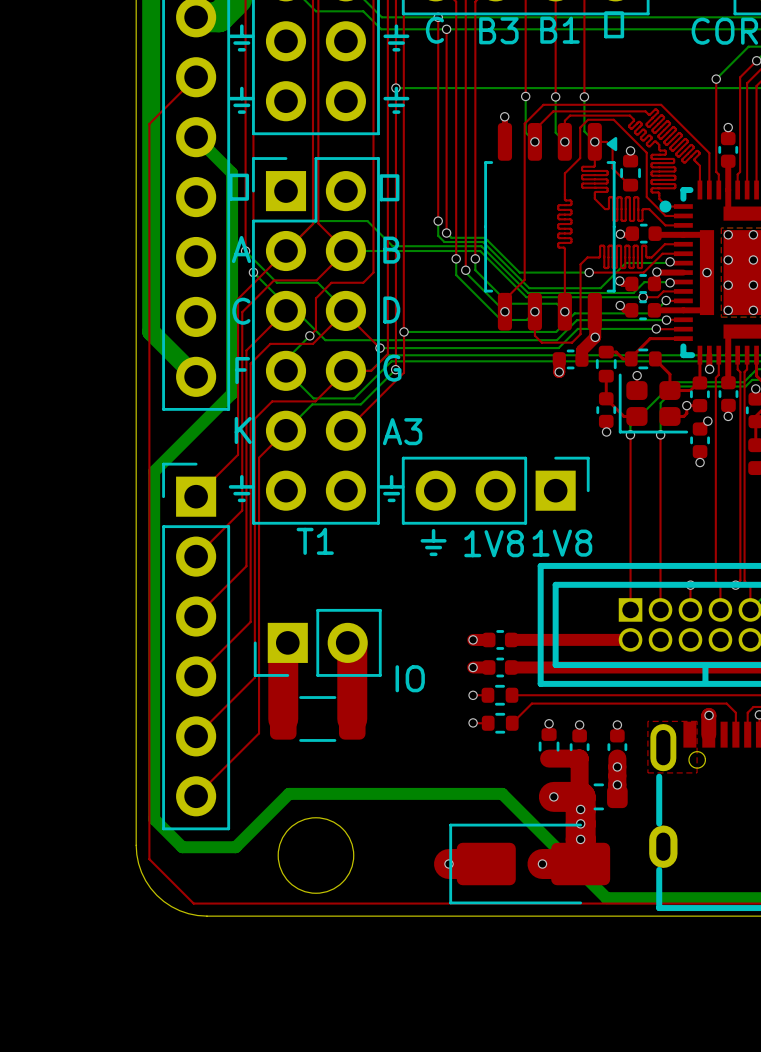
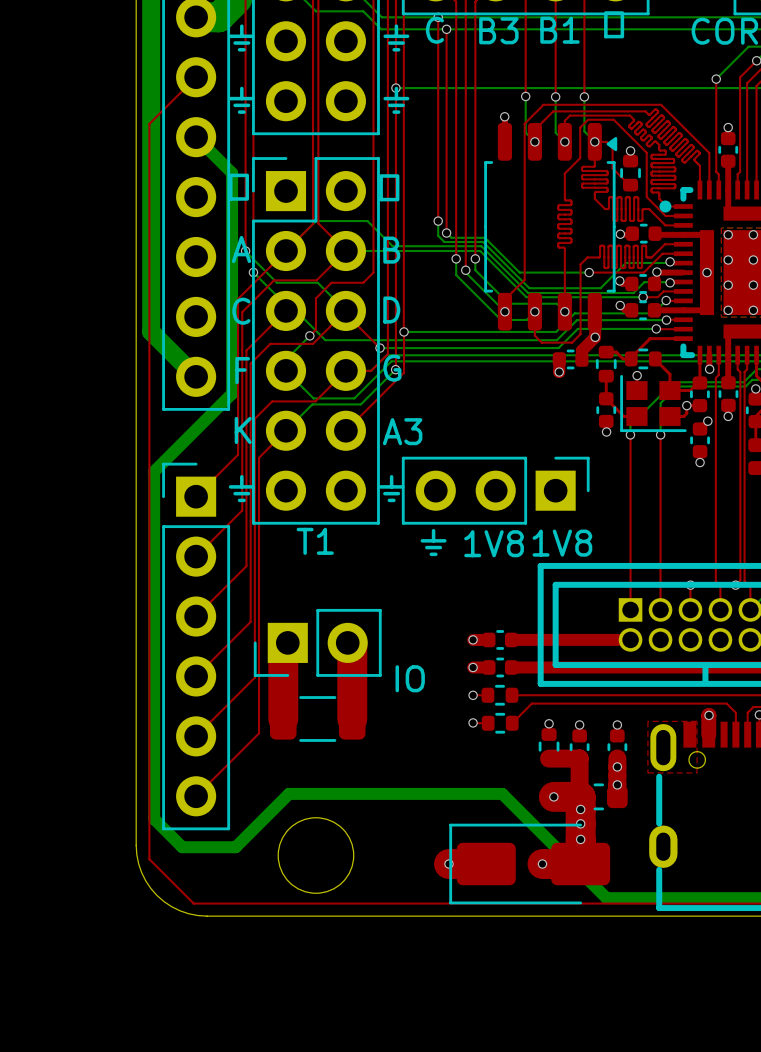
part footprint: [618, 373, 689, 434] -> [620, 374, 687, 433]

